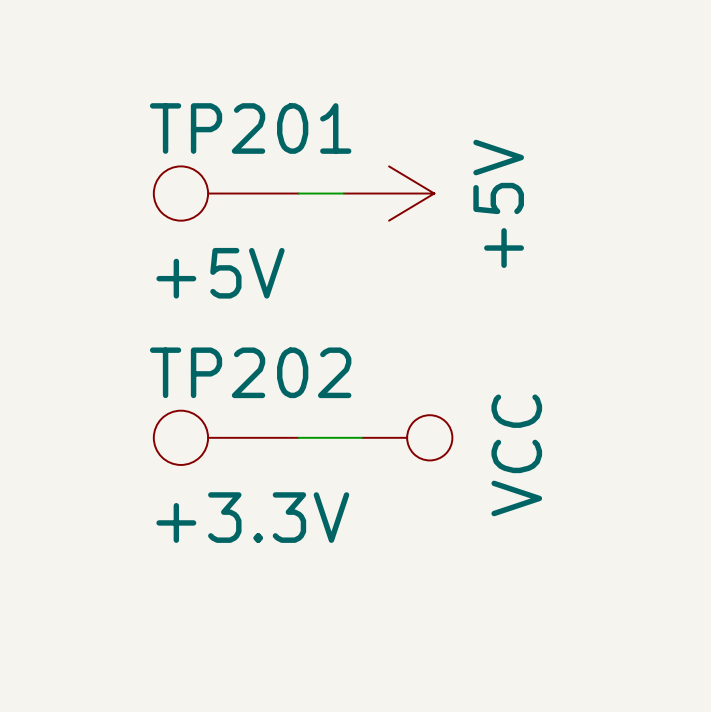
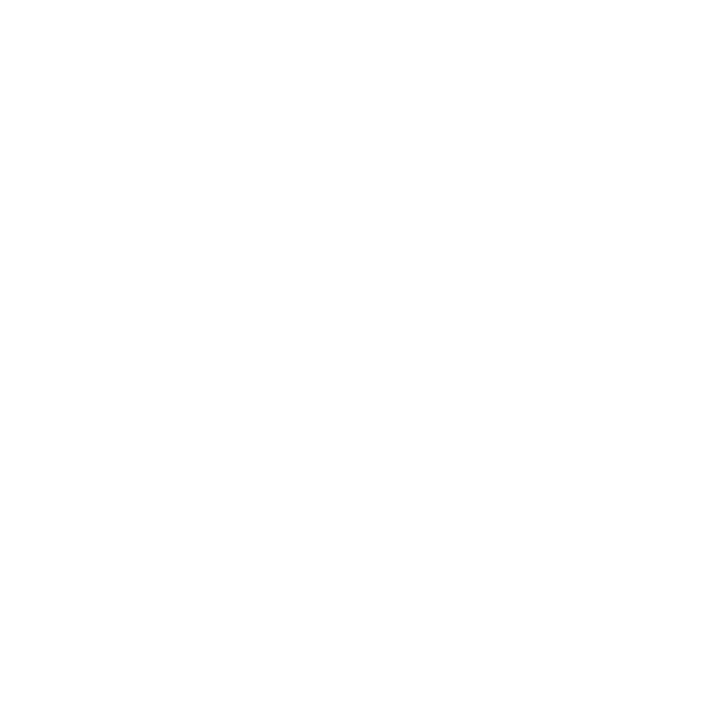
TP201: +5V (226, 193) -> none
wire: (298, 193) (343, 193) -> none
power symbol: +5V (389, 193) -> none
TP202: +3.3V (226, 437) -> none
wire: (298, 437) (361, 437) -> none
power symbol: VCC (407, 437) -> none

